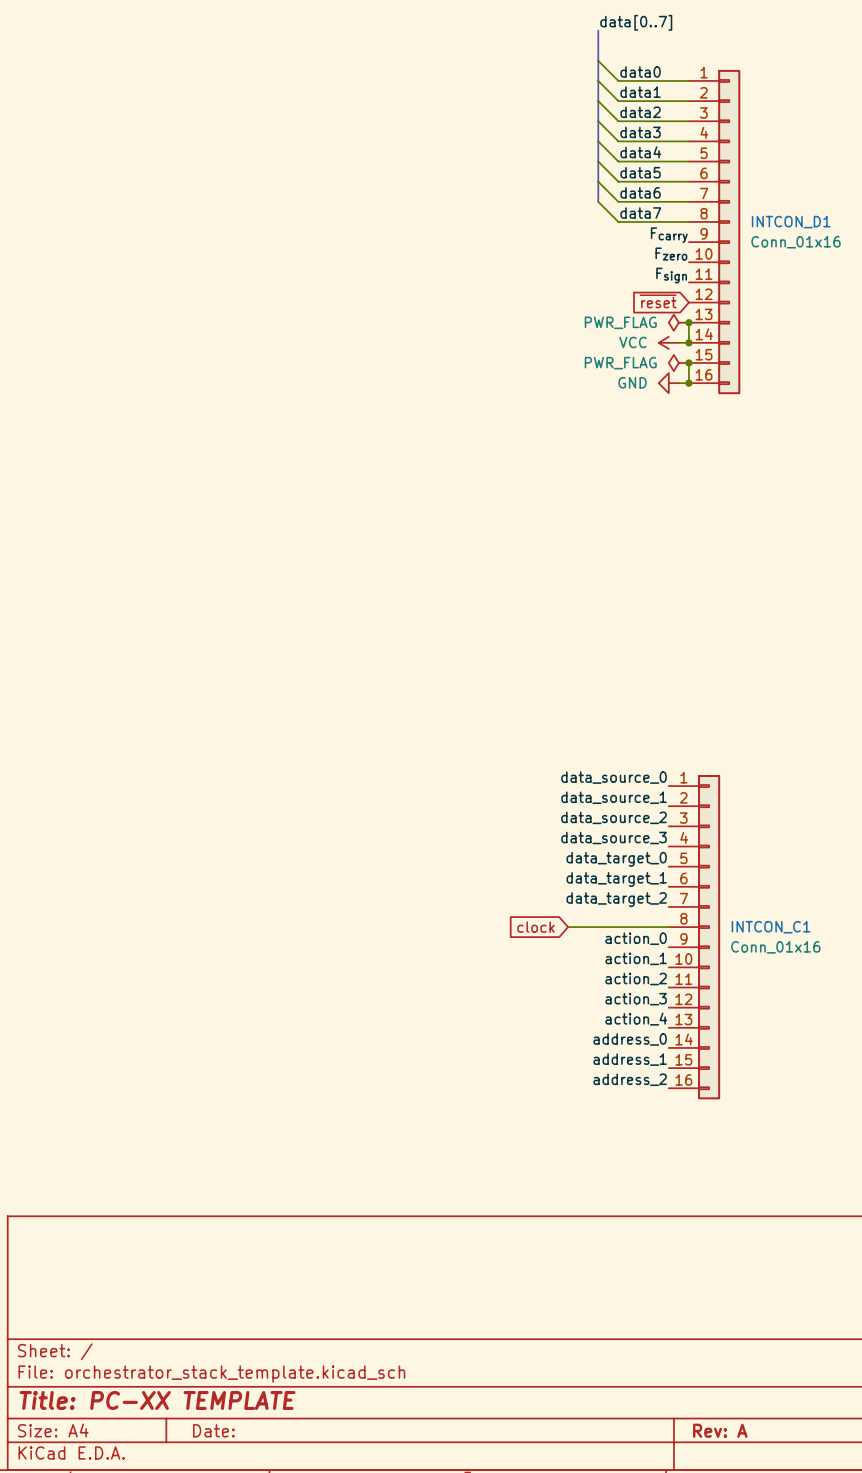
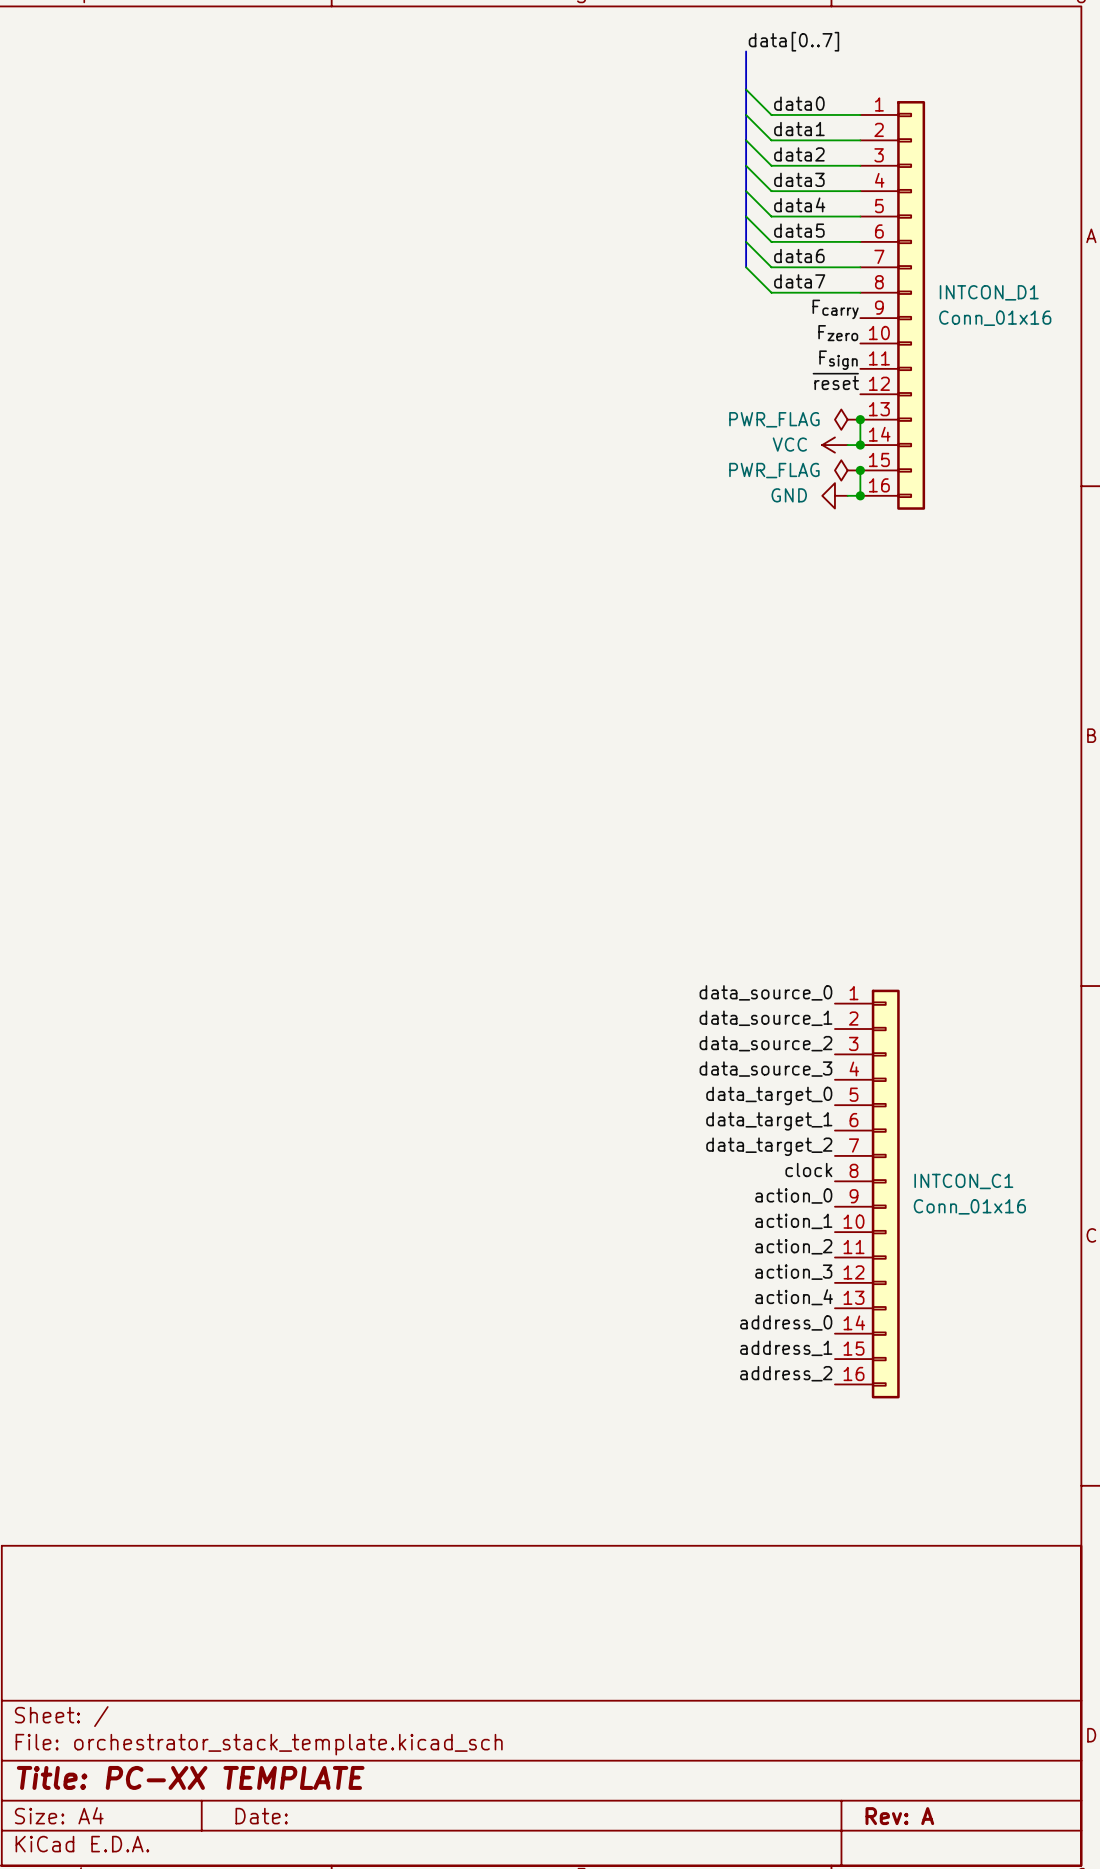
label: none -> ~{reset} (835, 381)
global label: ~{reset} (658, 301) -> none
label: none -> clock (808, 1170)
global label: clock (536, 927) -> none
wire: (568, 927) (668, 927) -> none

